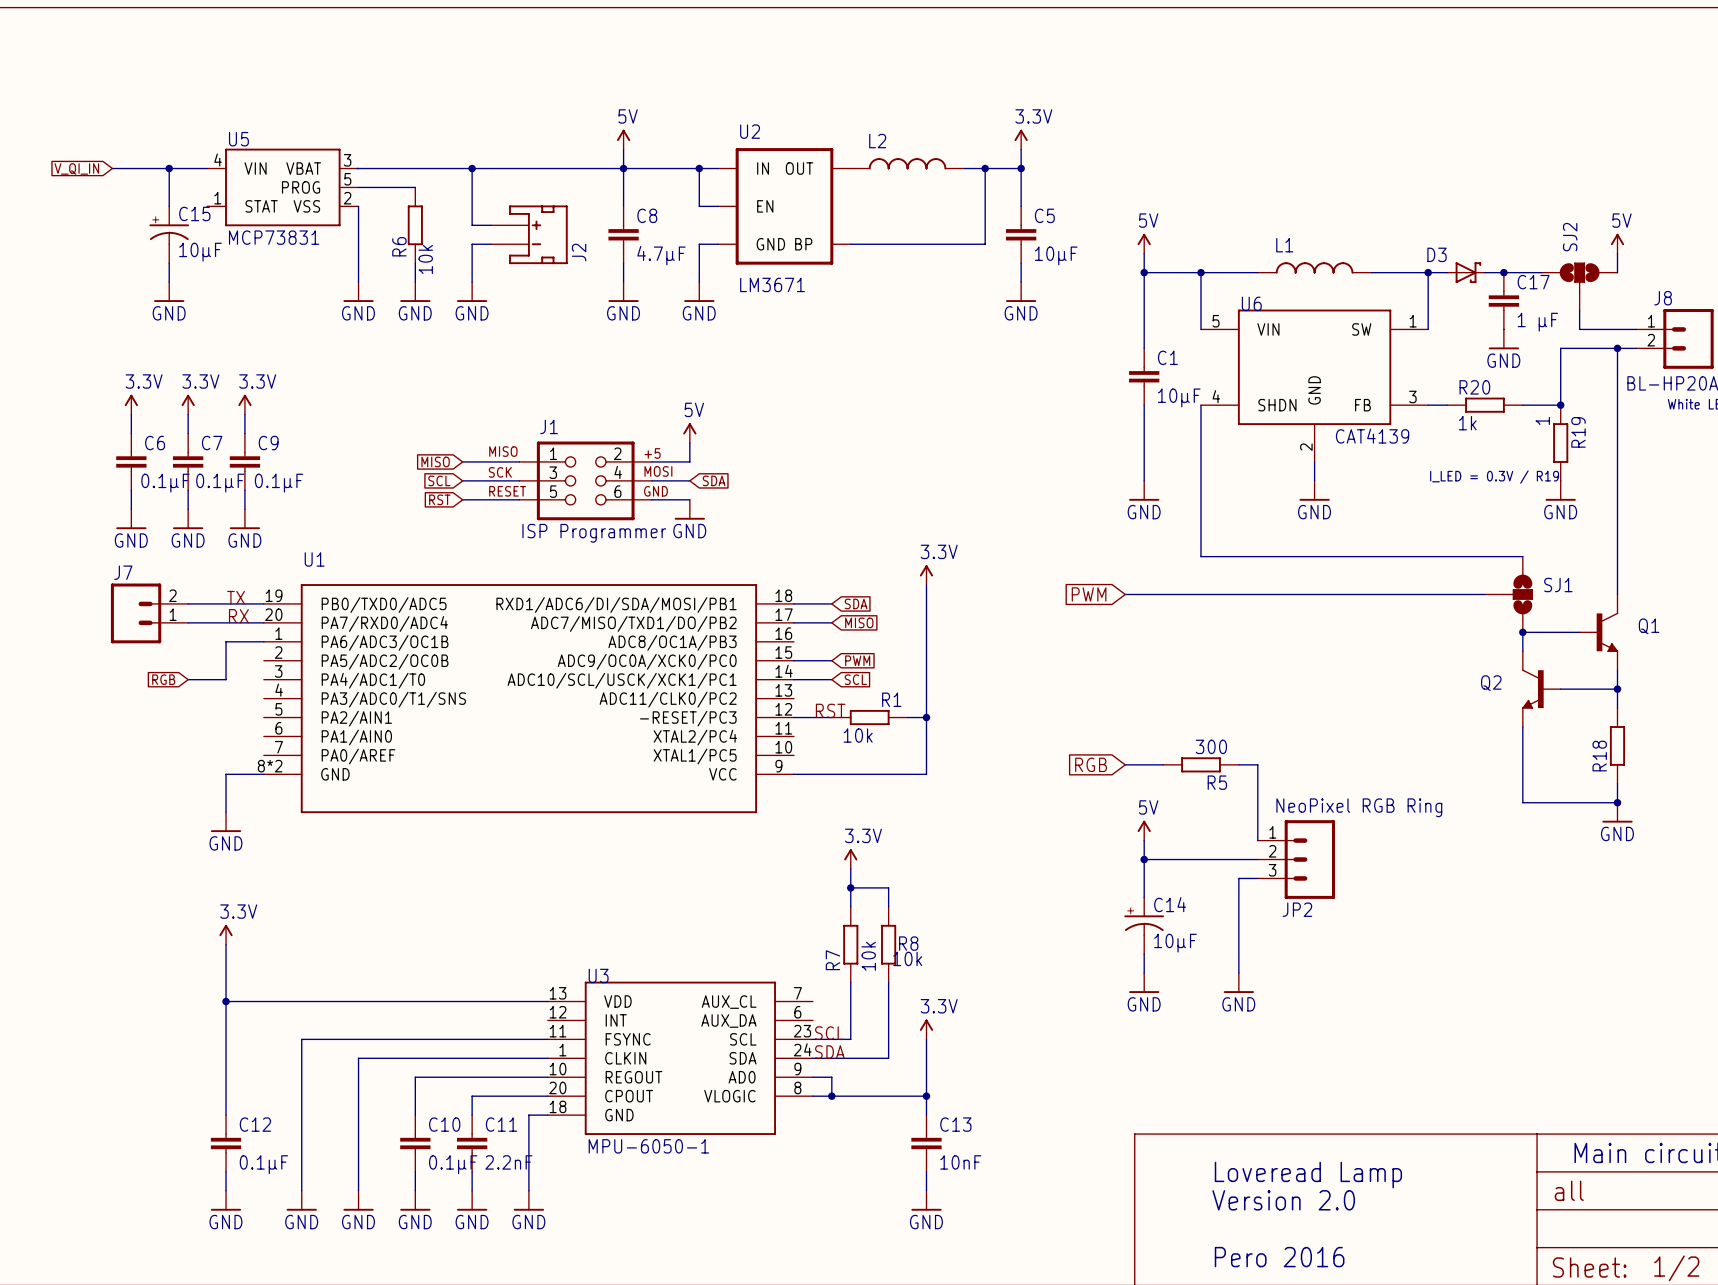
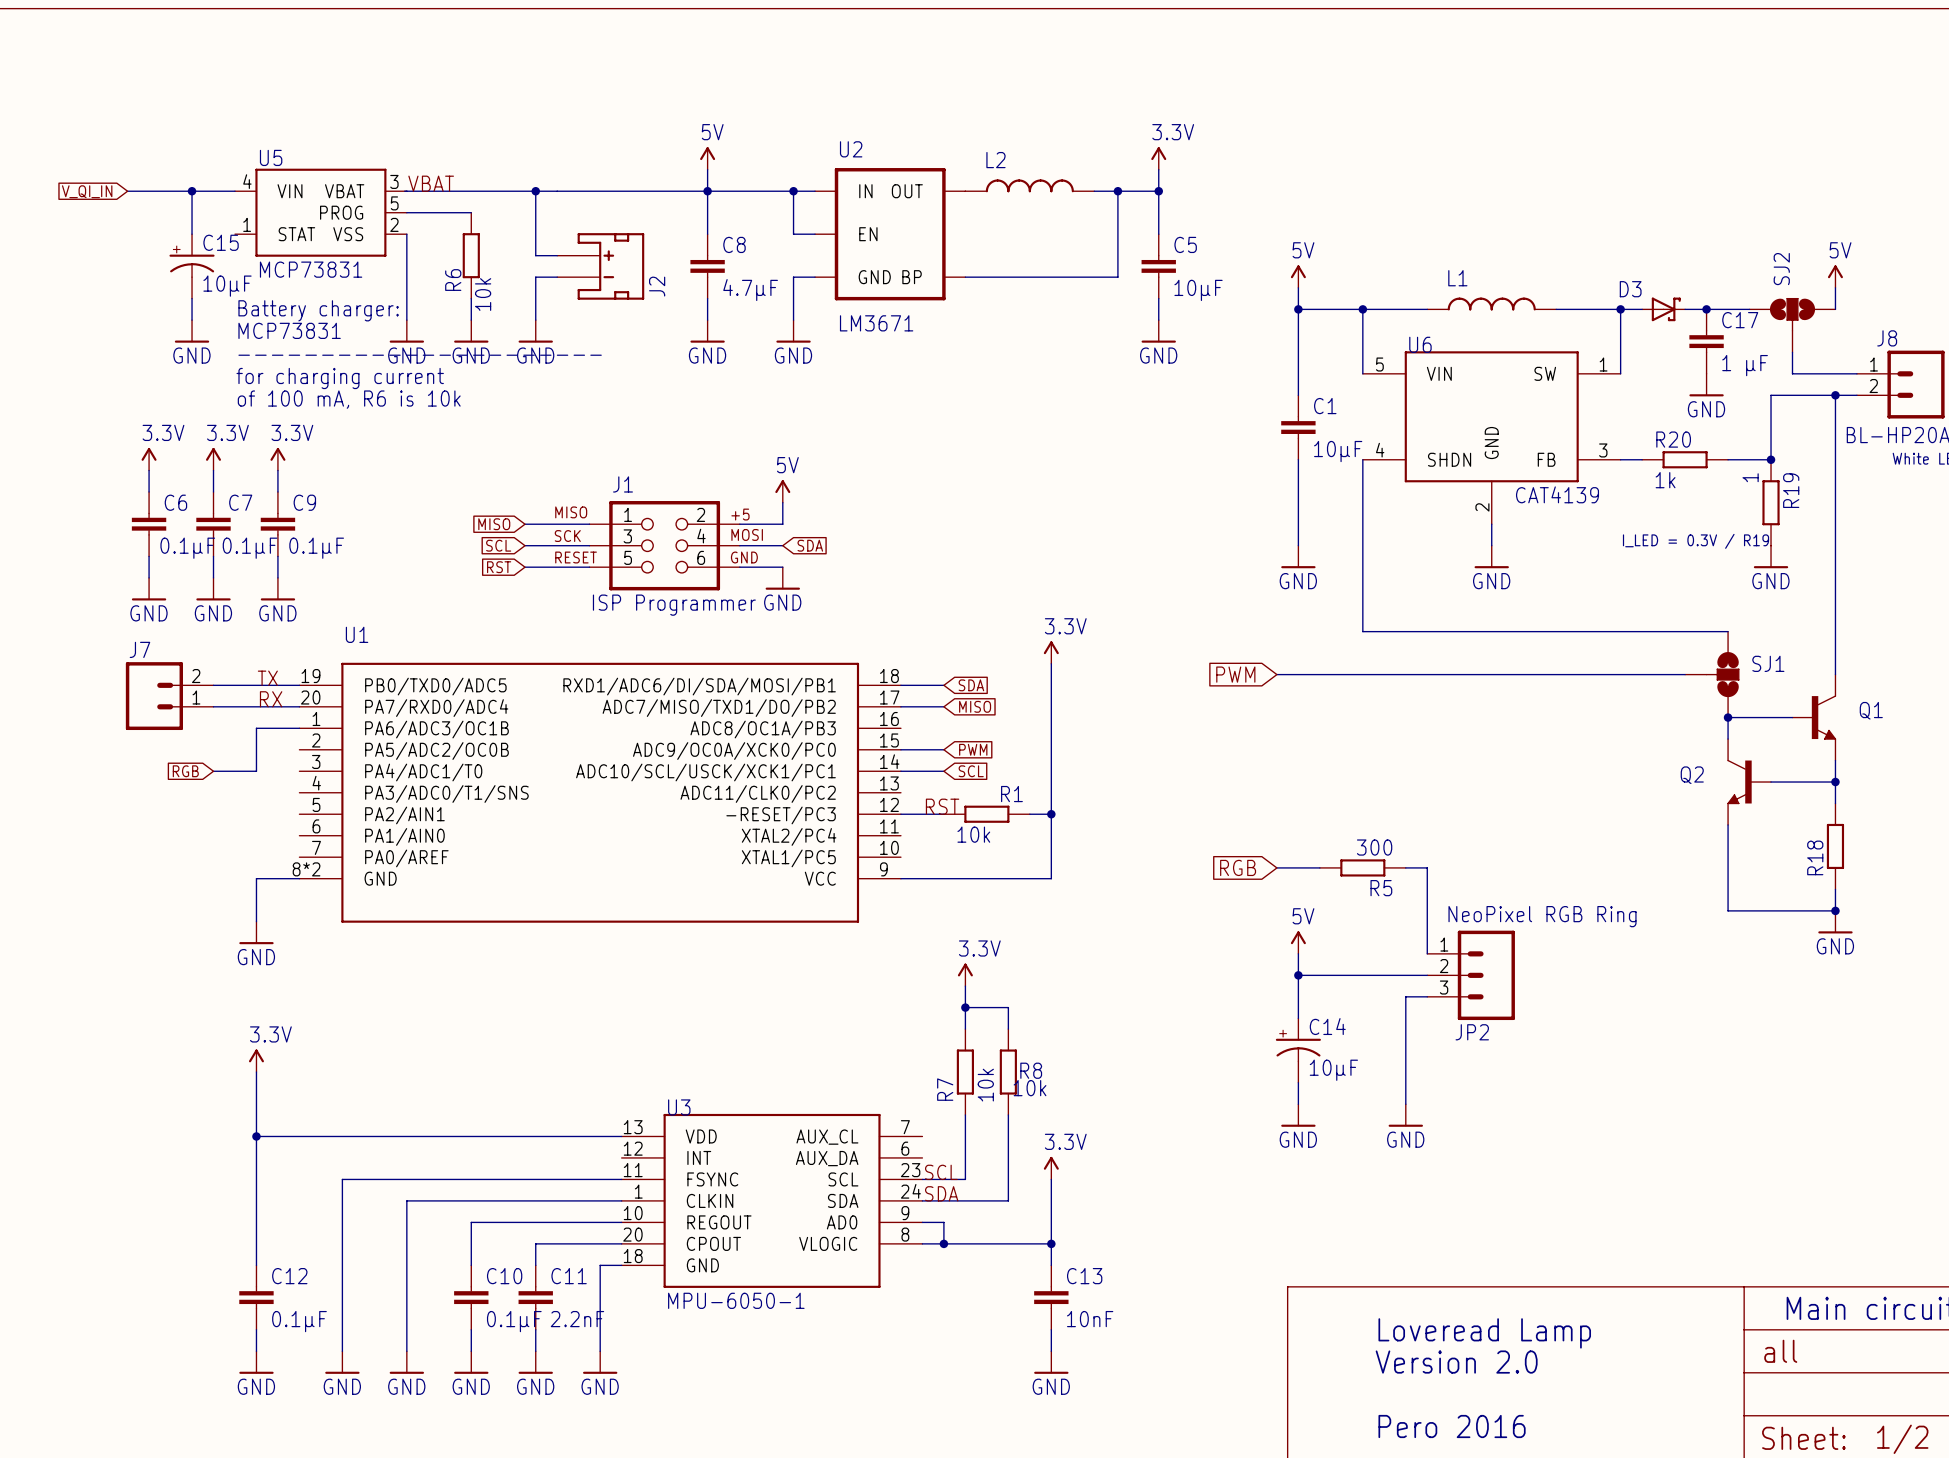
label: none -> VBAT (431, 183)
text: none -> Battery charger: (318, 310)
text: none -> MCP73831 (289, 330)
text: none -> ---------------------- (420, 355)
text: none -> for charging current (340, 378)
text: none -> of 100 mA, R6 is 10k (349, 399)

